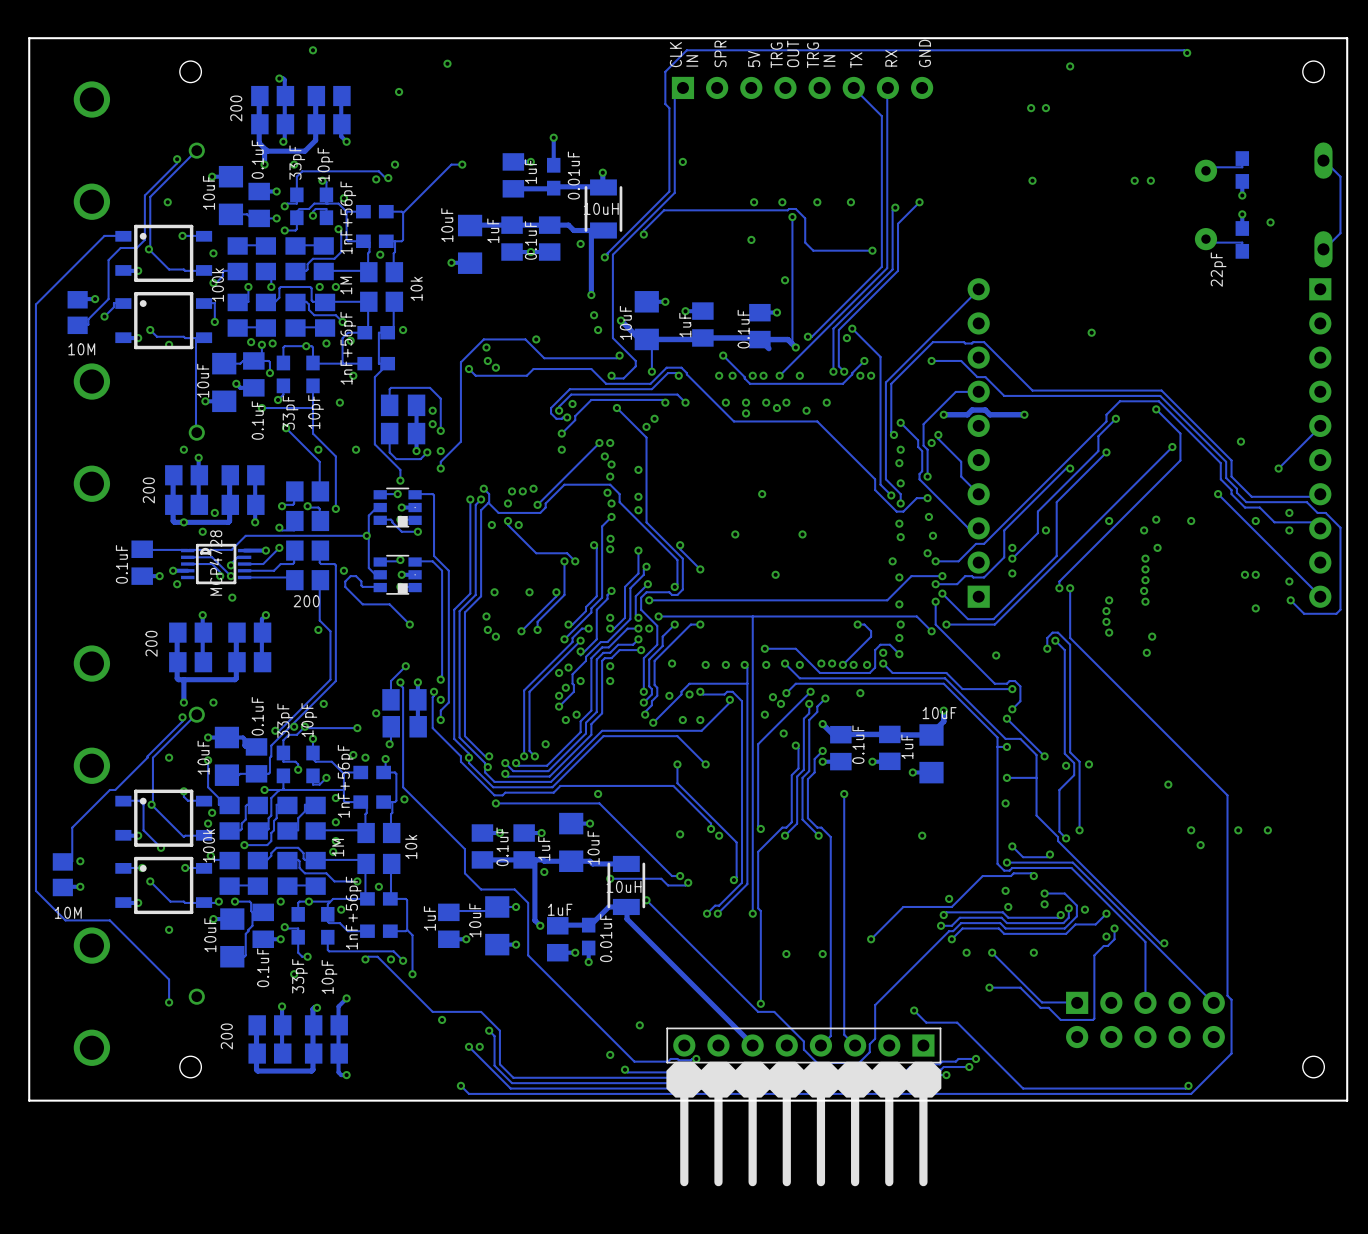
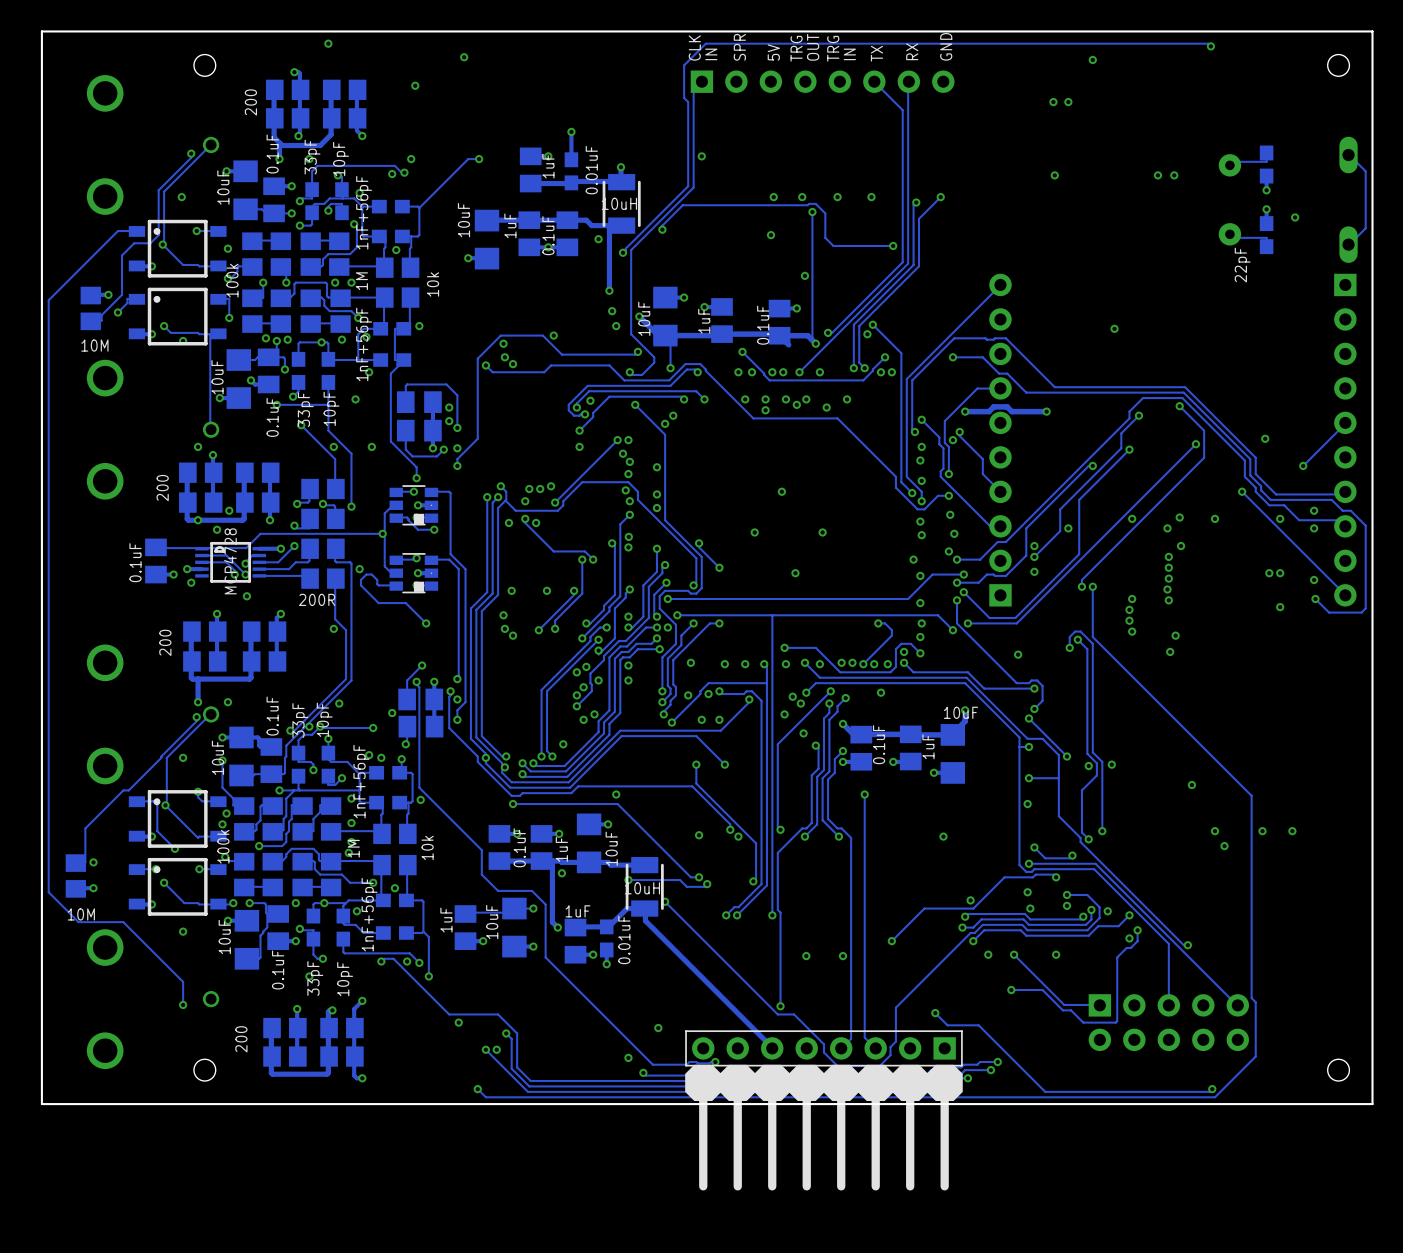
part value: 200 (306, 601) -> 200R (317, 599)

